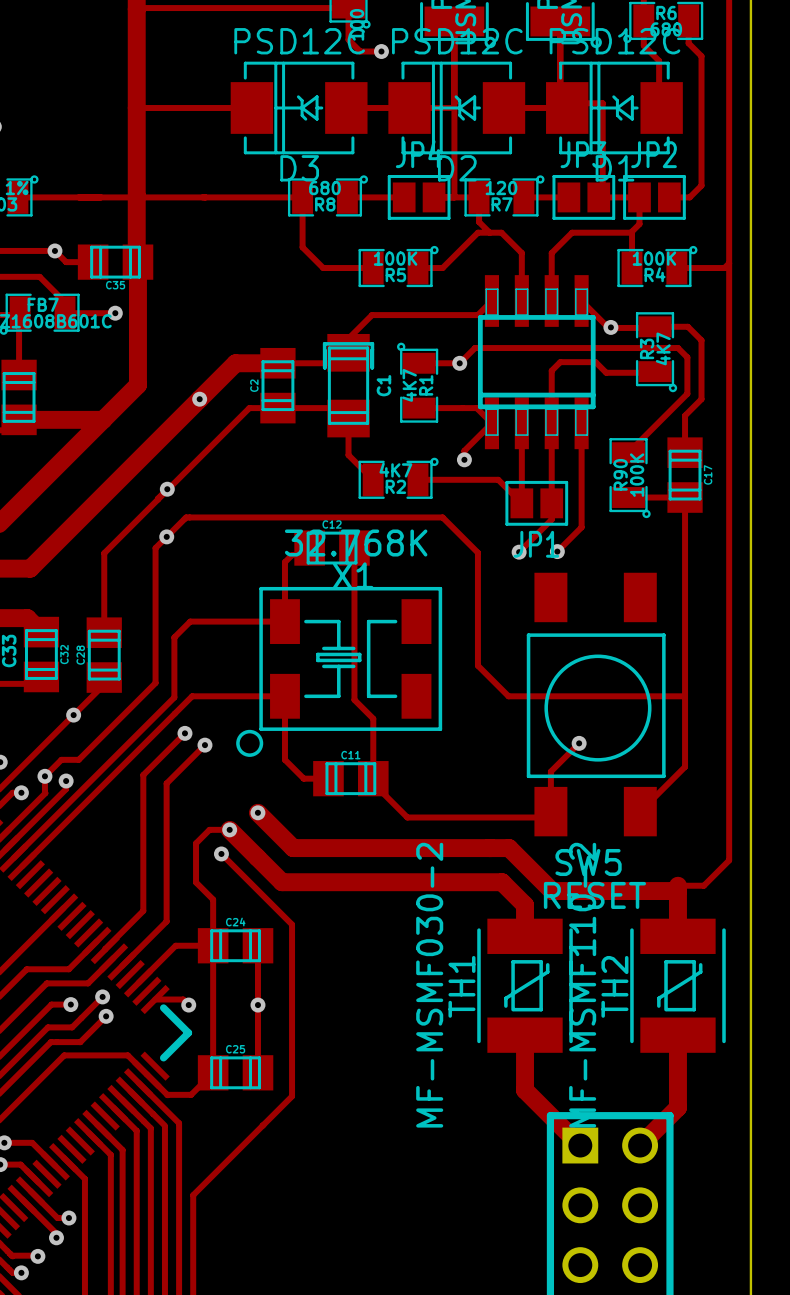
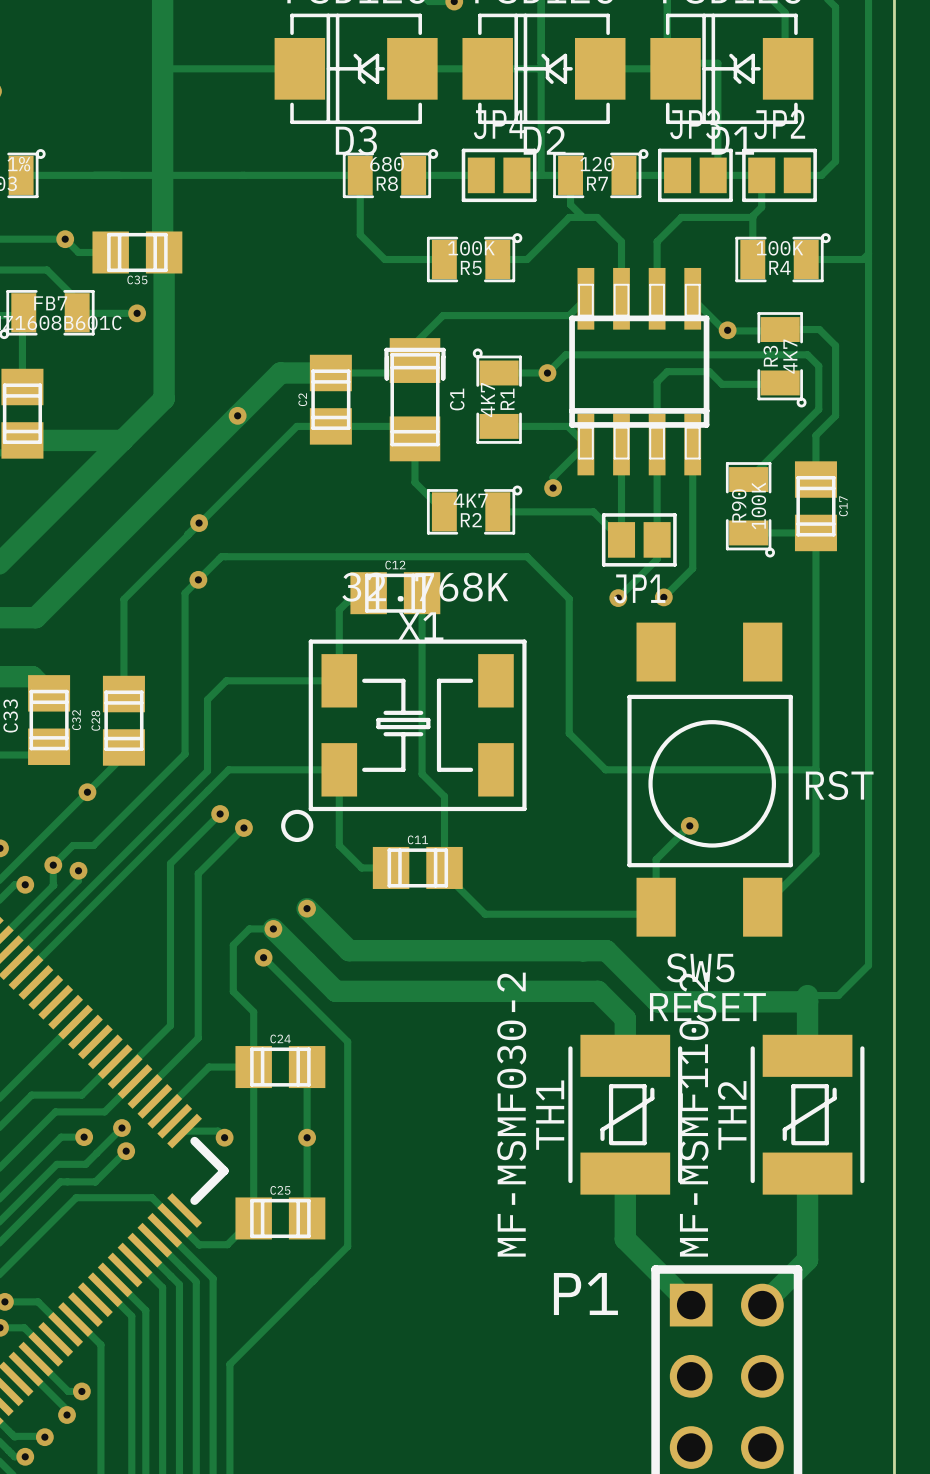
text: none -> RST (839, 785)
text: none -> P1 (585, 1293)

